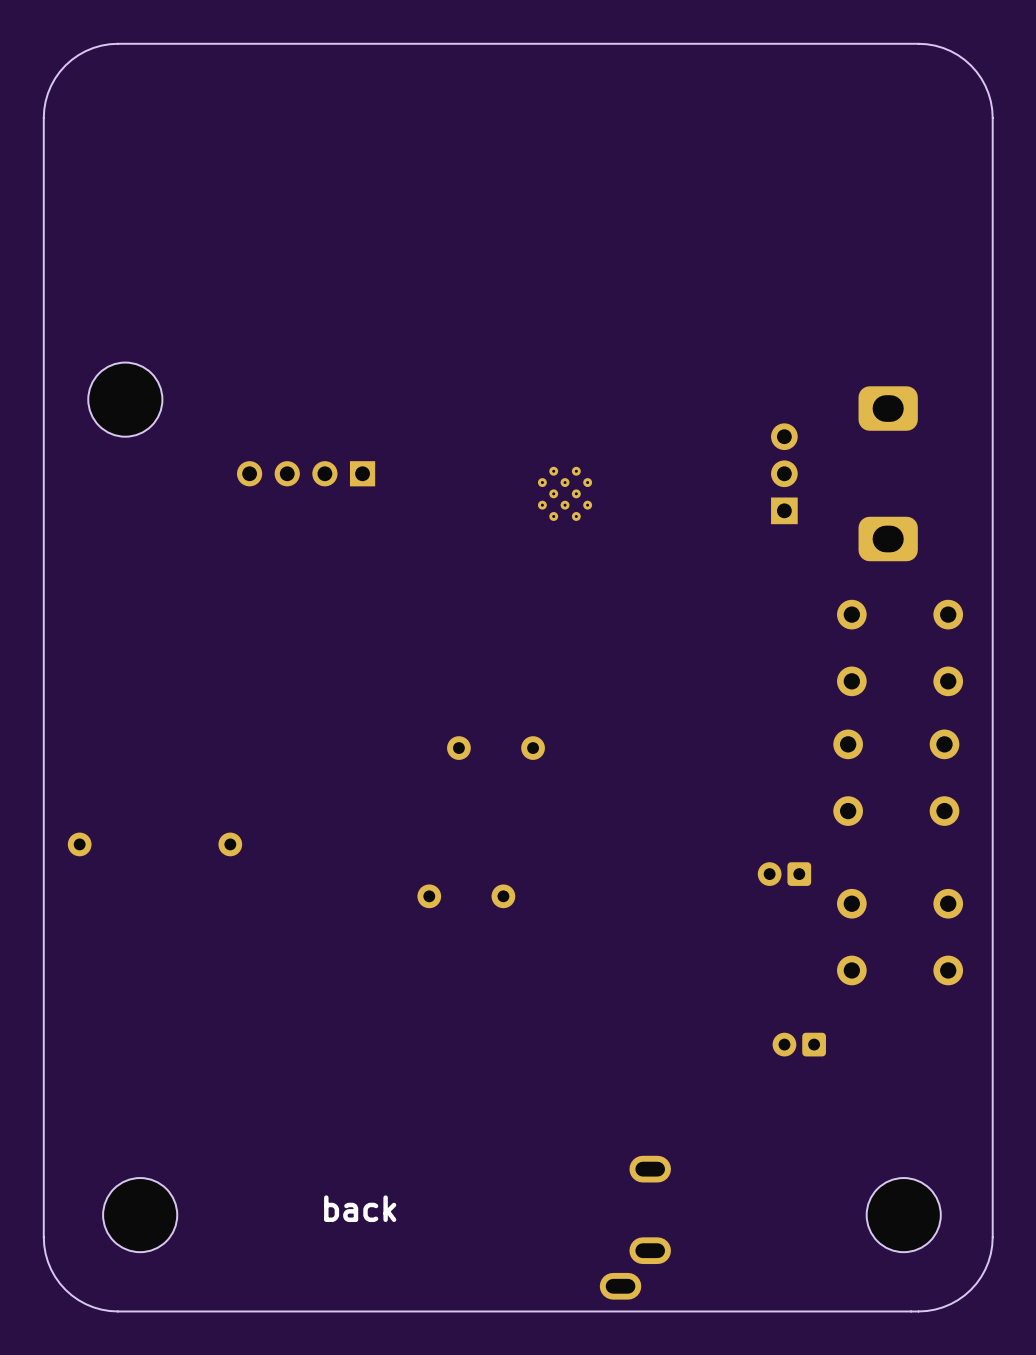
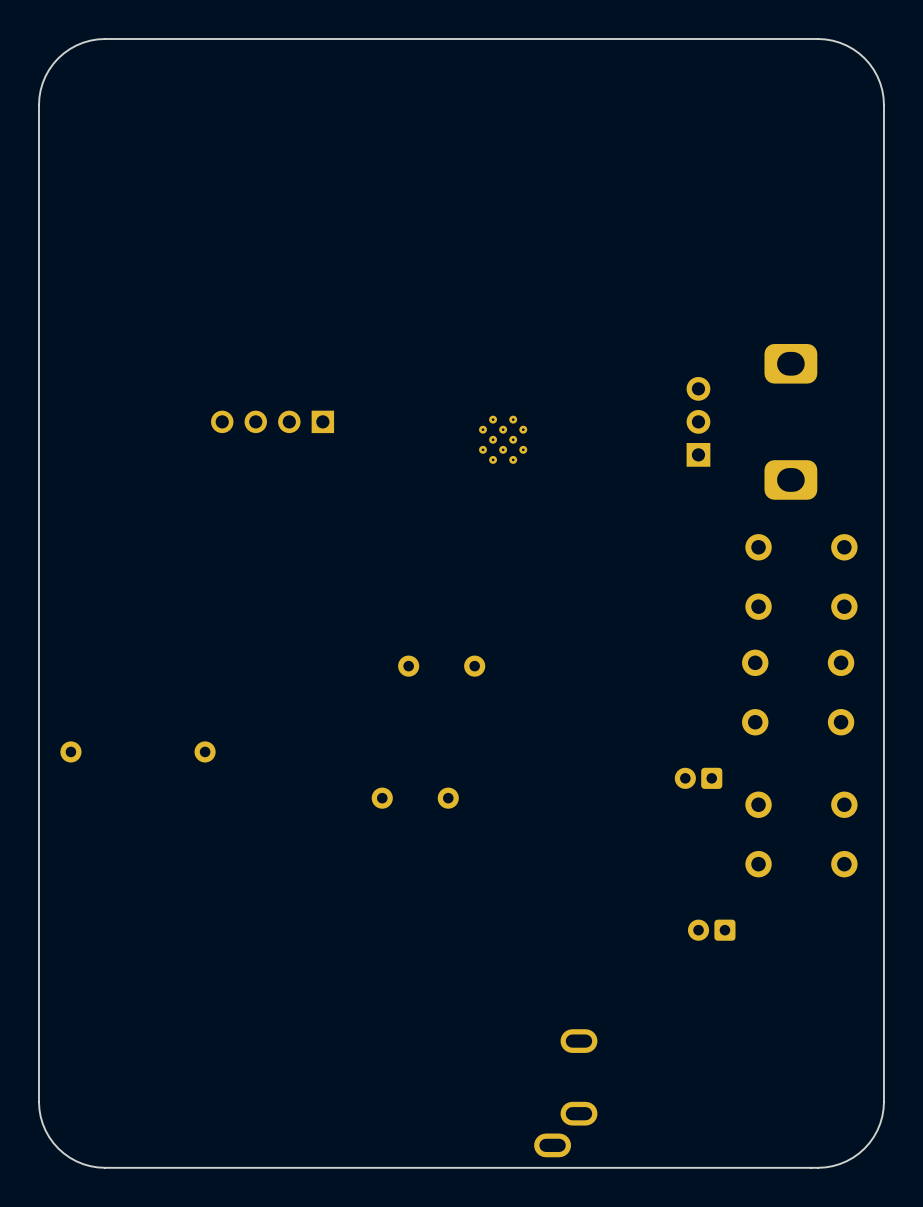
part: (125, 399) -> none
text: back (360, 1208) -> none
part: (140, 1215) -> none
part: (903, 1215) -> none

